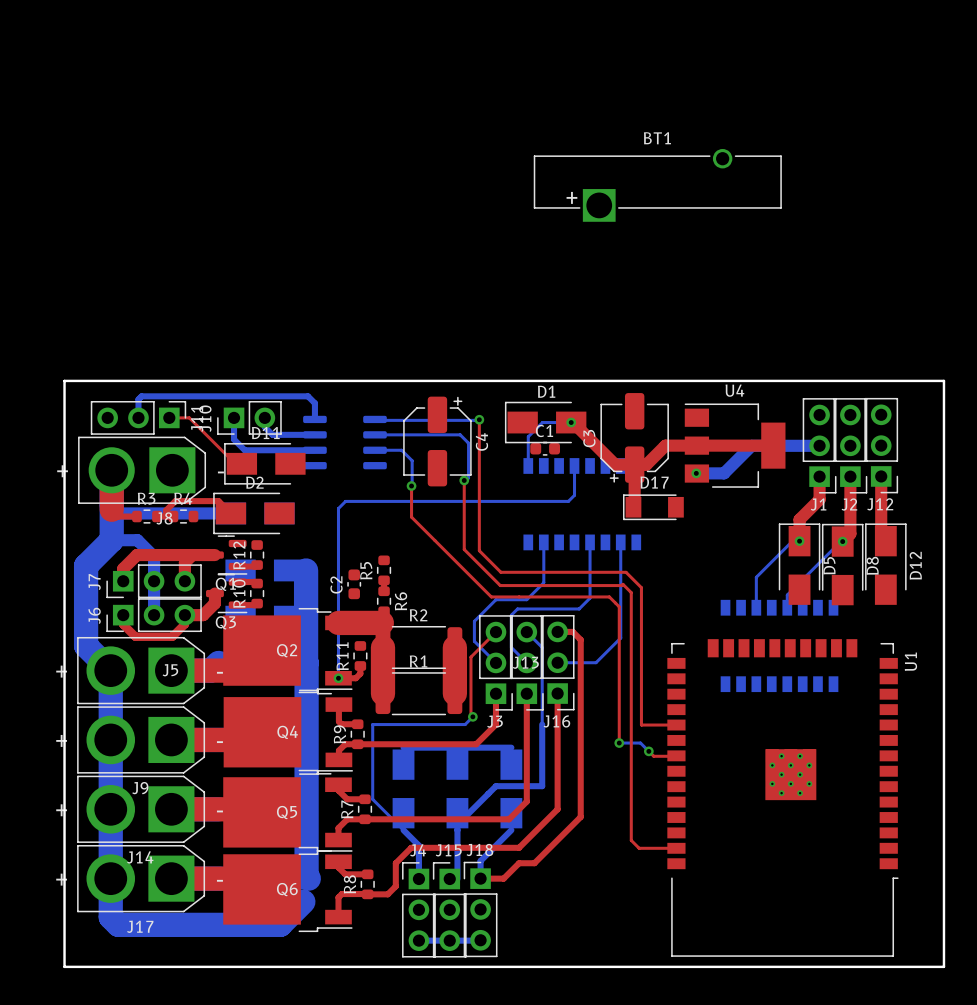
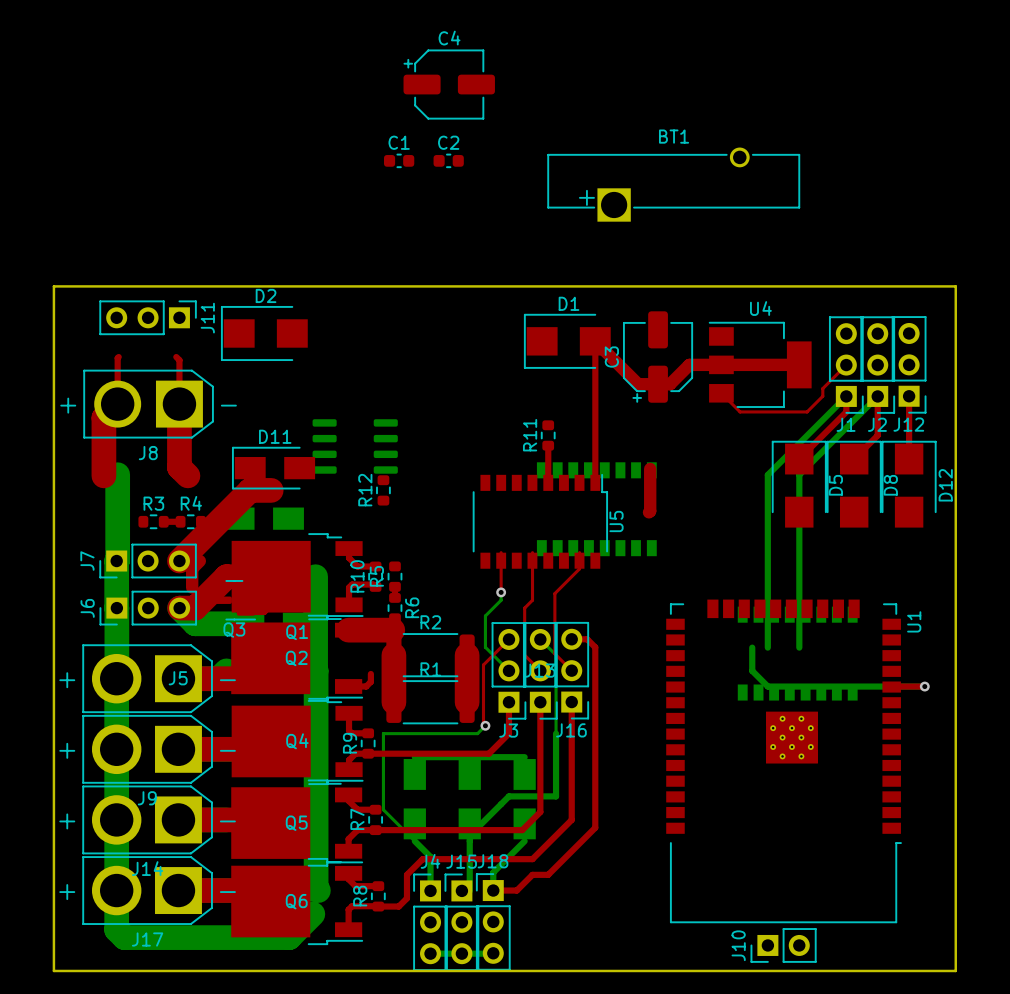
top track: none -> (118, 357) (117, 404) (103, 417) (103, 475)
top track: none -> (176, 357) (179, 360) (179, 467) (187, 475)
top track: none -> (799, 364) (689, 364) (670, 384) (638, 384) (595, 341) (595, 482)
top track: none -> (846, 365) (822, 388) (822, 396) (807, 411) (740, 411) (721, 393)
board edge: (64, 380) (943, 380) (943, 966) (64, 966) (64, 380) -> (53, 286) (53, 970) (955, 970) (955, 286) (53, 286)
top track: none -> (846, 396) (846, 411) (799, 459)
bottom track: none -> (846, 396) (767, 474) (767, 647)
top track: none -> (877, 396) (877, 435) (854, 459)
bottom track: none -> (877, 396) (799, 474) (799, 647)
top track: none -> (909, 396) (909, 459)
D1 footprint: [504, 401, 587, 444] -> [524, 314, 611, 369]
bottom track: (138, 417) (138, 399) (141, 396) (307, 396) (314, 403) (314, 419) -> none
J11 position: (138, 417) -> (148, 317)
top track: (169, 417) (189, 417) (235, 463) (241, 463) -> none
bottom track: (234, 417) (234, 439) (244, 450) (314, 450) -> none
J10 position: (249, 417) -> (783, 945)
bottom track: (264, 417) (264, 427) (272, 434) (314, 434) -> none
bottom track: (375, 419) (479, 419) -> none
top track: (479, 419) (479, 550) (500, 572) (626, 572) (641, 587) (641, 724) (676, 725) -> none
via: (479, 419) -> none
bottom track: (571, 422) (542, 422) (528, 436) (528, 465) -> none
via: (571, 422) -> none
top track: (573, 422) (615, 464) (646, 464) (665, 445) (773, 445) -> none
bottom track: (375, 434) (460, 434) (468, 443) (468, 478) (464, 480) -> none
C3 position: (634, 437) -> (658, 357)
C4 rotation: 0° (437, 441) -> 90° counterclockwise (449, 84)
C4 position: (437, 441) -> (449, 84)
top track: none -> (548, 445) (548, 482)
U4 position: (735, 445) -> (760, 364)
bottom track: (819, 445) (751, 445) (724, 473) (696, 473) -> none
J1 position: (819, 445) -> (846, 365)
J2 position: (850, 445) -> (877, 365)
J12 position: (881, 445) -> (909, 364)
C1 position: (545, 448) -> (399, 160)
bottom track: (375, 450) (401, 450) (412, 460) (411, 486) -> none
bottom track: (574, 465) (574, 495) (568, 501) (345, 501) (338, 508) (338, 678) -> none
top track: (111, 470) (111, 509) (118, 516) (136, 516) -> none
J8 position: (142, 470) -> (148, 404)
via: (696, 473) -> none
top track: (850, 476) (850, 533) (842, 541) -> none
top track: (881, 476) (881, 536) (885, 541) -> none
top track: (464, 480) (464, 549) (500, 585) (622, 584) (631, 592) (631, 840) (639, 848) (676, 848) -> none
via: (464, 480) -> none
top track: none -> (271, 490) (250, 490) (179, 561)
top track: (411, 486) (411, 517) (491, 596) (609, 596) (619, 606) (619, 743) -> none
via: (411, 486) -> none
top track: (819, 491) (819, 476) (819, 499) (799, 519) (799, 541) -> none
D2 footprint: [213, 492, 295, 535] -> [221, 306, 308, 361]
bottom track: (111, 505) (119, 513) (230, 513) -> none
D17: (653, 507) -> none
top track: (230, 513) (218, 501) (175, 501) (166, 510) (166, 516) -> none
U5: none -> (540, 521)
J8 name position: J8 (164, 518) -> J8 (148, 453)
D5 footprint: [778, 523, 821, 605] -> [771, 440, 827, 528]
D8 footprint: [821, 523, 864, 606] -> [826, 440, 882, 528]
D12 footprint: [865, 523, 907, 605] -> [881, 440, 937, 528]
Q1 footprint: [206, 535, 248, 575] -> [231, 533, 364, 621]
bottom track: (799, 541) (792, 541) (756, 577) (756, 607) -> none
via: (799, 541) -> none
bottom track: (842, 541) (787, 595) (787, 607) -> none
via: (842, 541) -> none
top track: none -> (349, 548) (349, 557) (357, 566) (375, 566)
bottom track: (543, 542) (543, 582) (526, 599) (495, 599) (474, 621) (474, 641) -> (501, 592) (501, 600) (485, 615) (487, 648)
bottom track: (590, 542) (590, 598) (579, 608) (517, 608) (511, 615) (511, 647) (526, 662) -> none
bottom track: (620, 542) (620, 638) -> none
top track: none -> (501, 552) (501, 592)
top track: none -> (532, 552) (532, 600) (524, 608) (524, 655) (540, 670)
top track: none -> (579, 552) (579, 568) (554, 593) (554, 653) (571, 670)
top track: (214, 555) (136, 555) (123, 568) (123, 581) -> none
R12 position: (257, 555) -> (383, 490)
top track: none -> (271, 576) (226, 576) (195, 608) (179, 608)
top track: none -> (375, 586) (373, 584) (352, 584) (349, 587) (349, 604)
J7 position: (154, 581) -> (148, 561)
Q1 name position: Q1 (225, 584) -> Q1 (297, 632)
C2 rotation: 0° (354, 584) -> 90° clockwise (448, 160)
C2 position: (354, 584) -> (448, 160)
via: none -> (501, 592)
top track: (214, 593) (214, 603) (203, 615) (184, 615) (184, 624) (172, 636) (135, 636) (123, 624) (123, 615) -> none
R10 position: (257, 593) -> (375, 576)
bottom track: none -> (179, 608) (195, 623) (231, 623)
bottom track: (154, 615) (154, 556) (137, 540) (111, 540) (86, 565) (86, 645) (110, 670) -> (117, 545) (116, 678)
J6 position: (154, 615) -> (148, 608)
bottom track: (620, 637) (596, 662) (557, 662) -> none
bottom track: none -> (752, 647) (752, 670) (767, 686) (924, 686)
R11 position: (360, 655) -> (548, 435)
via: (338, 678) -> none
top track: none -> (924, 686) (891, 687)
via: none -> (924, 686)
bottom track: (619, 743) (640, 743) (648, 751) -> none
via: (619, 743) -> none
top track: (648, 751) (653, 756) (676, 755) -> none
via: (648, 751) -> none
U1 position: (782, 797) -> (783, 761)

